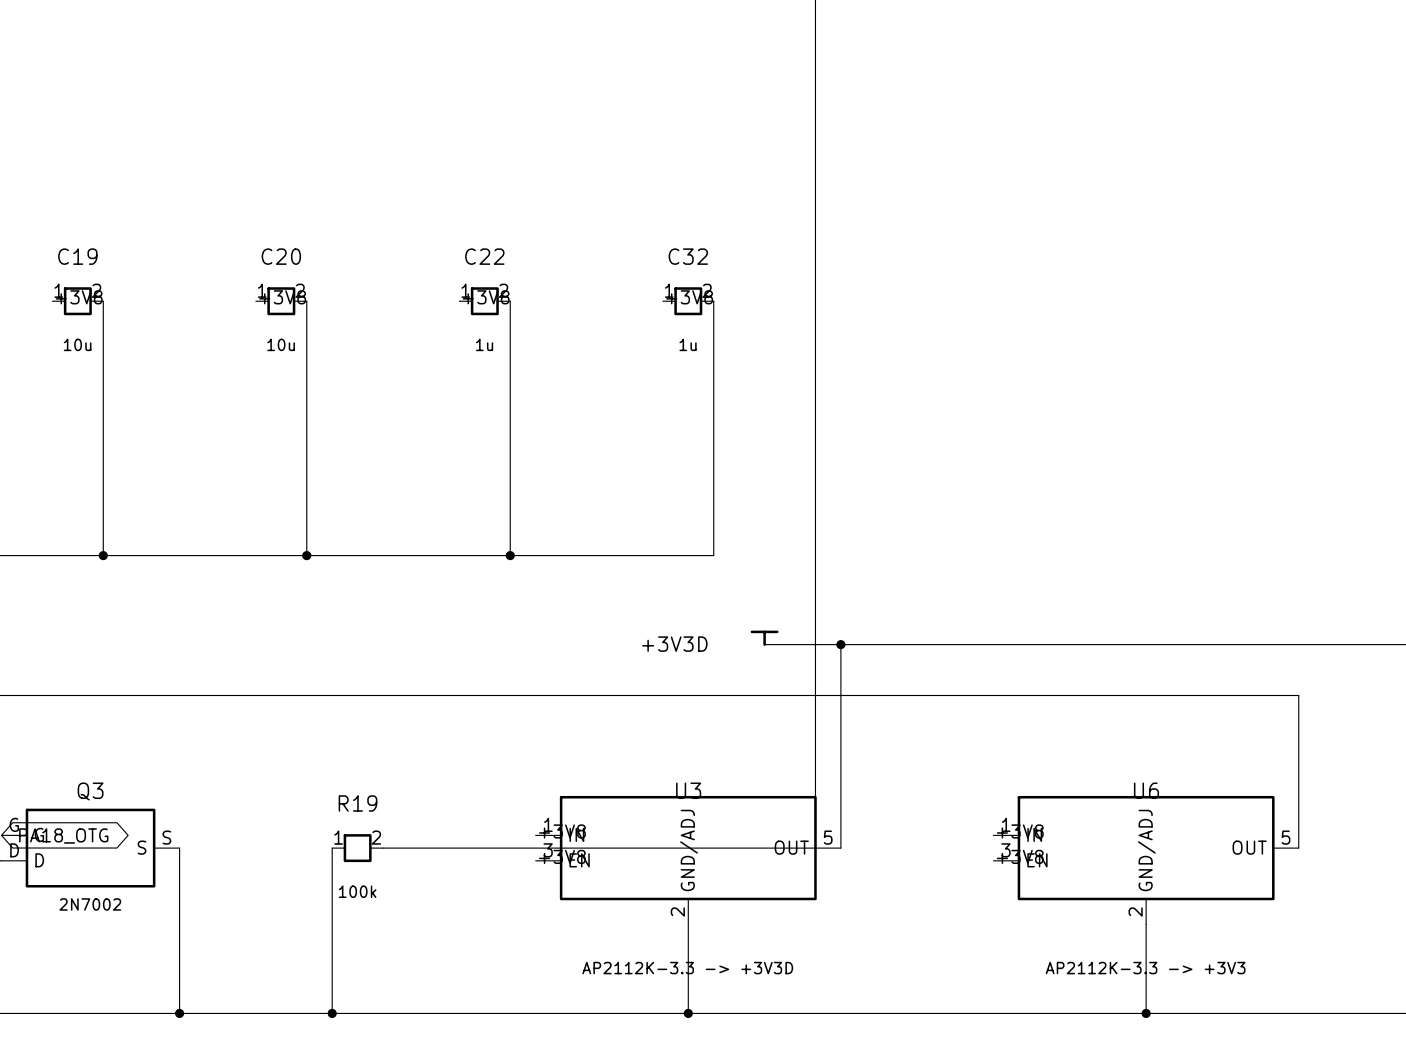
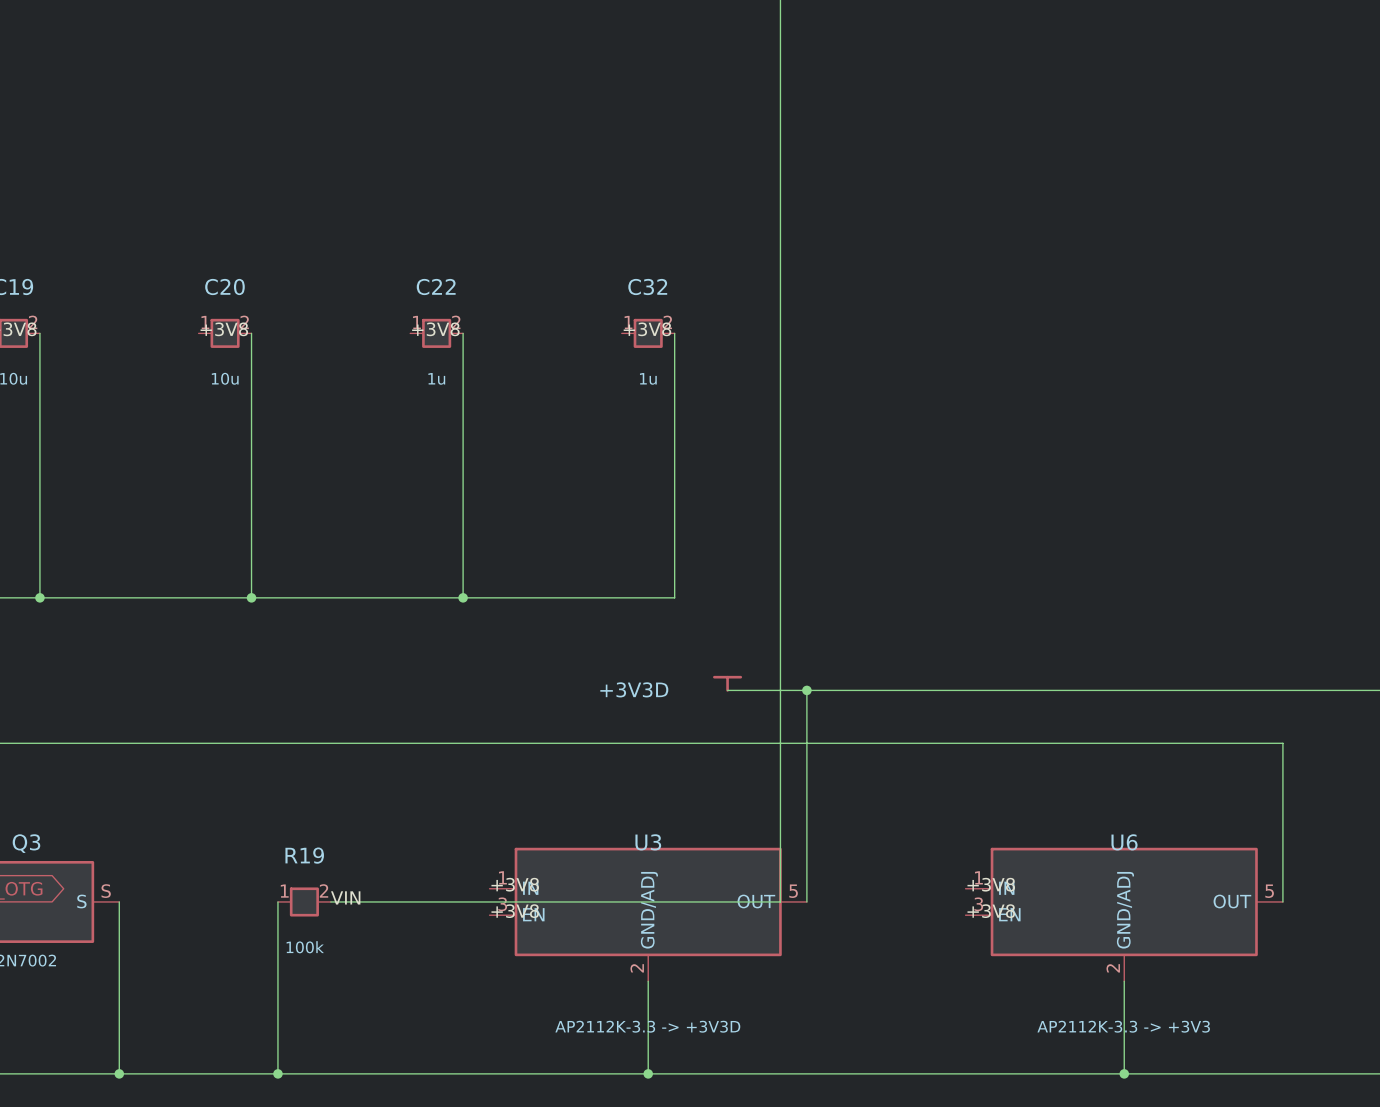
label: none -> VIN (345, 897)

